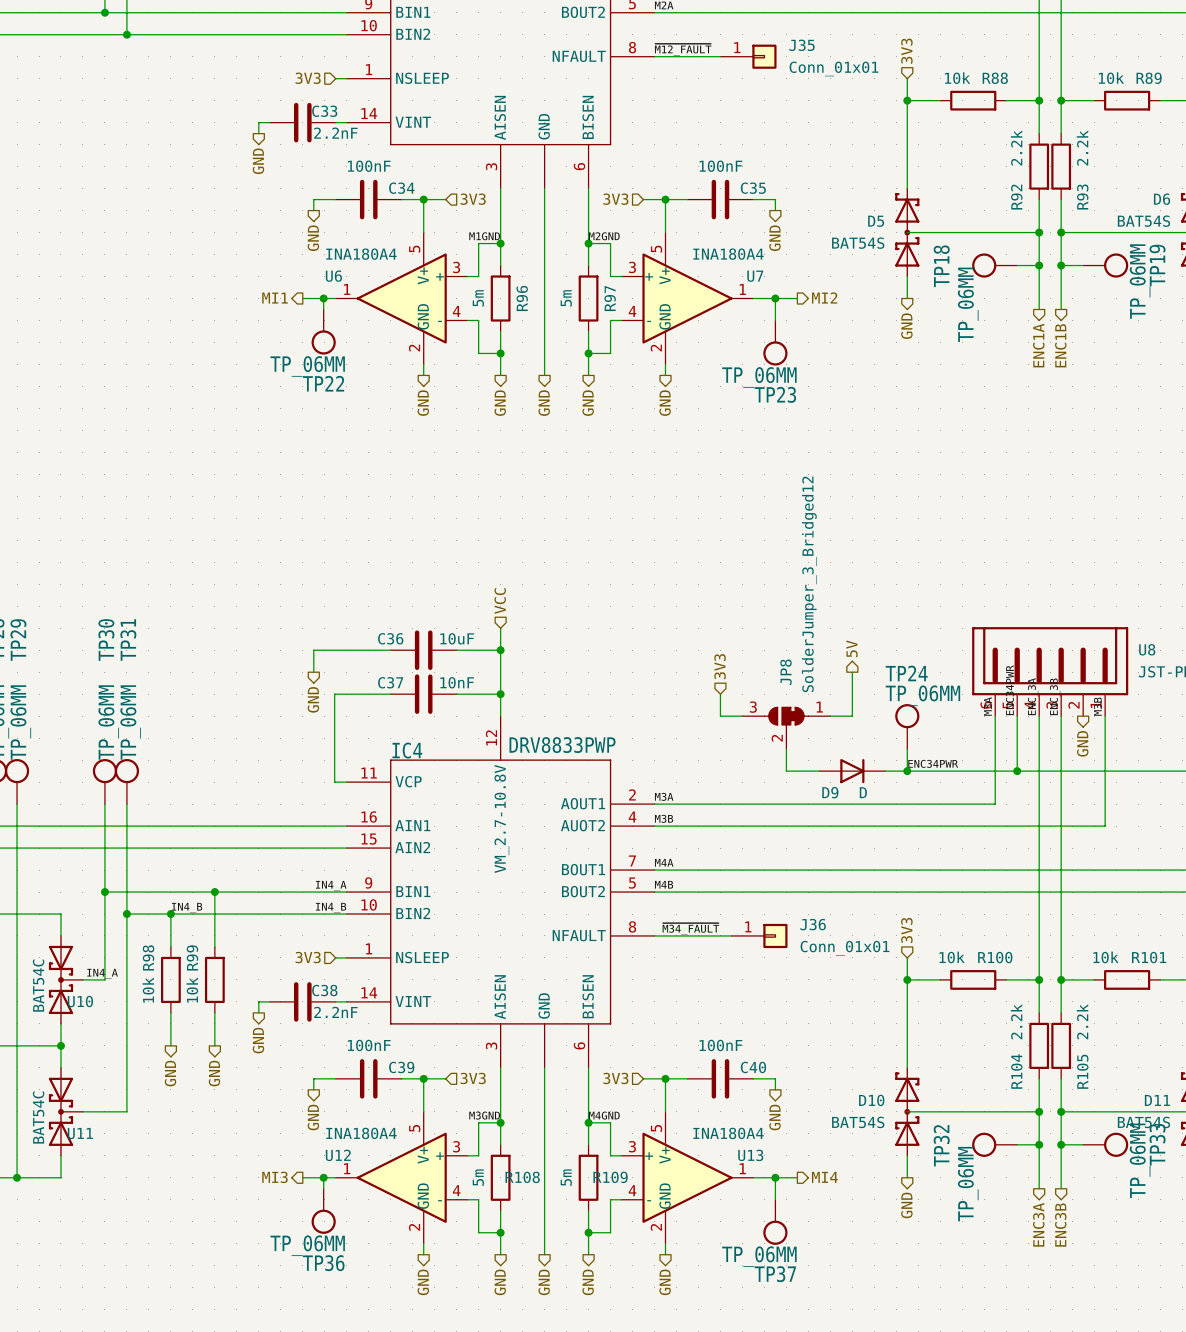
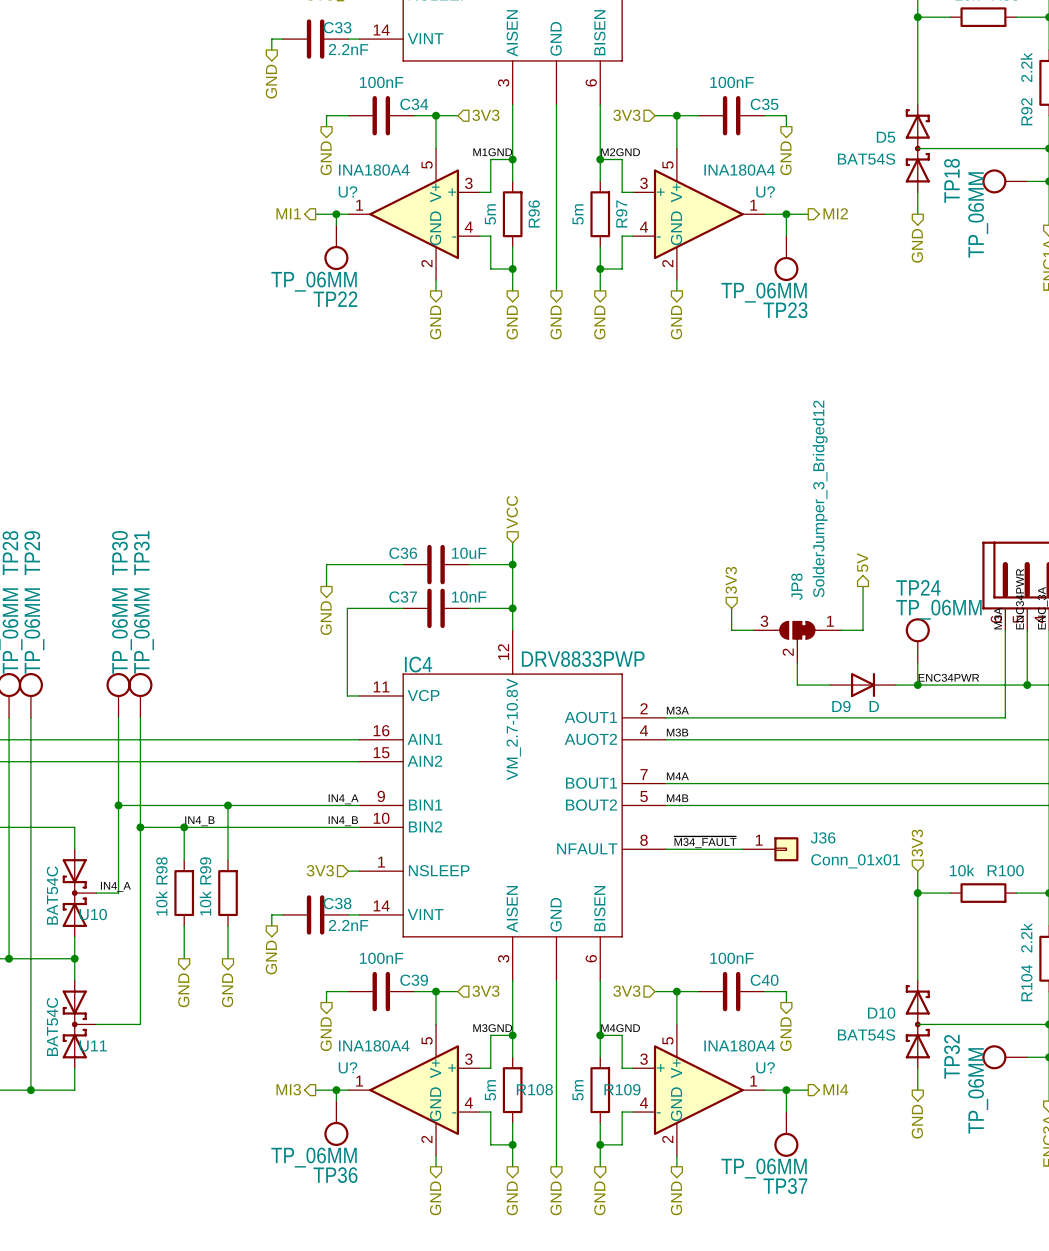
U6 name: U6 (333, 276) -> U? (347, 191)
U7 name: U7 (755, 276) -> U? (765, 191)
U12 name: U12 (338, 1155) -> U? (347, 1067)
U13 name: U13 (750, 1155) -> U? (765, 1067)

